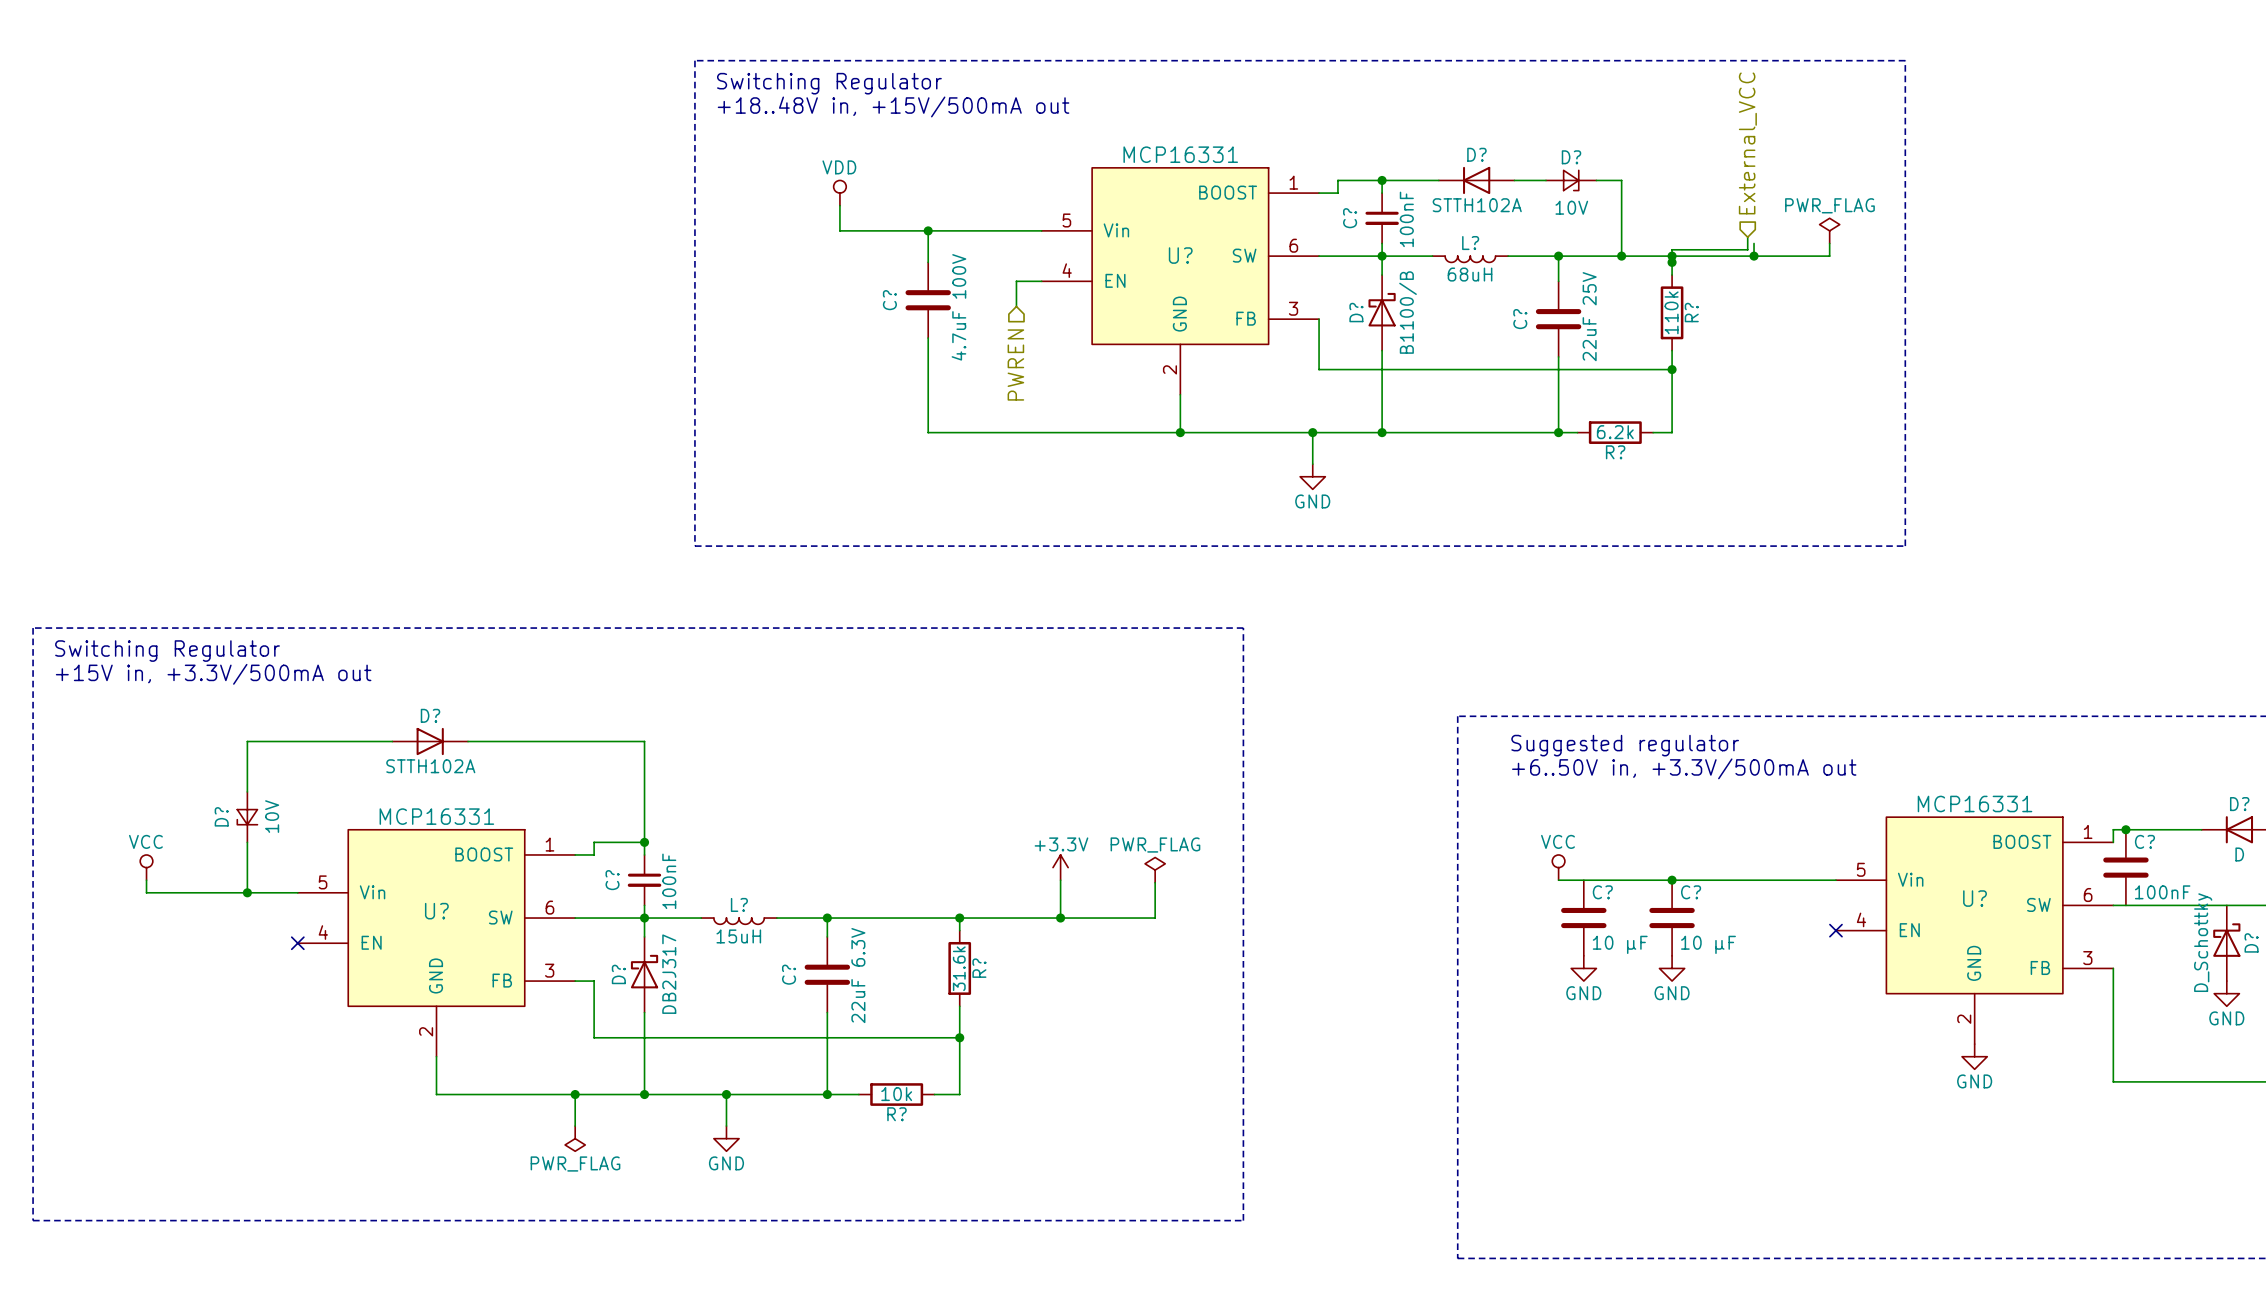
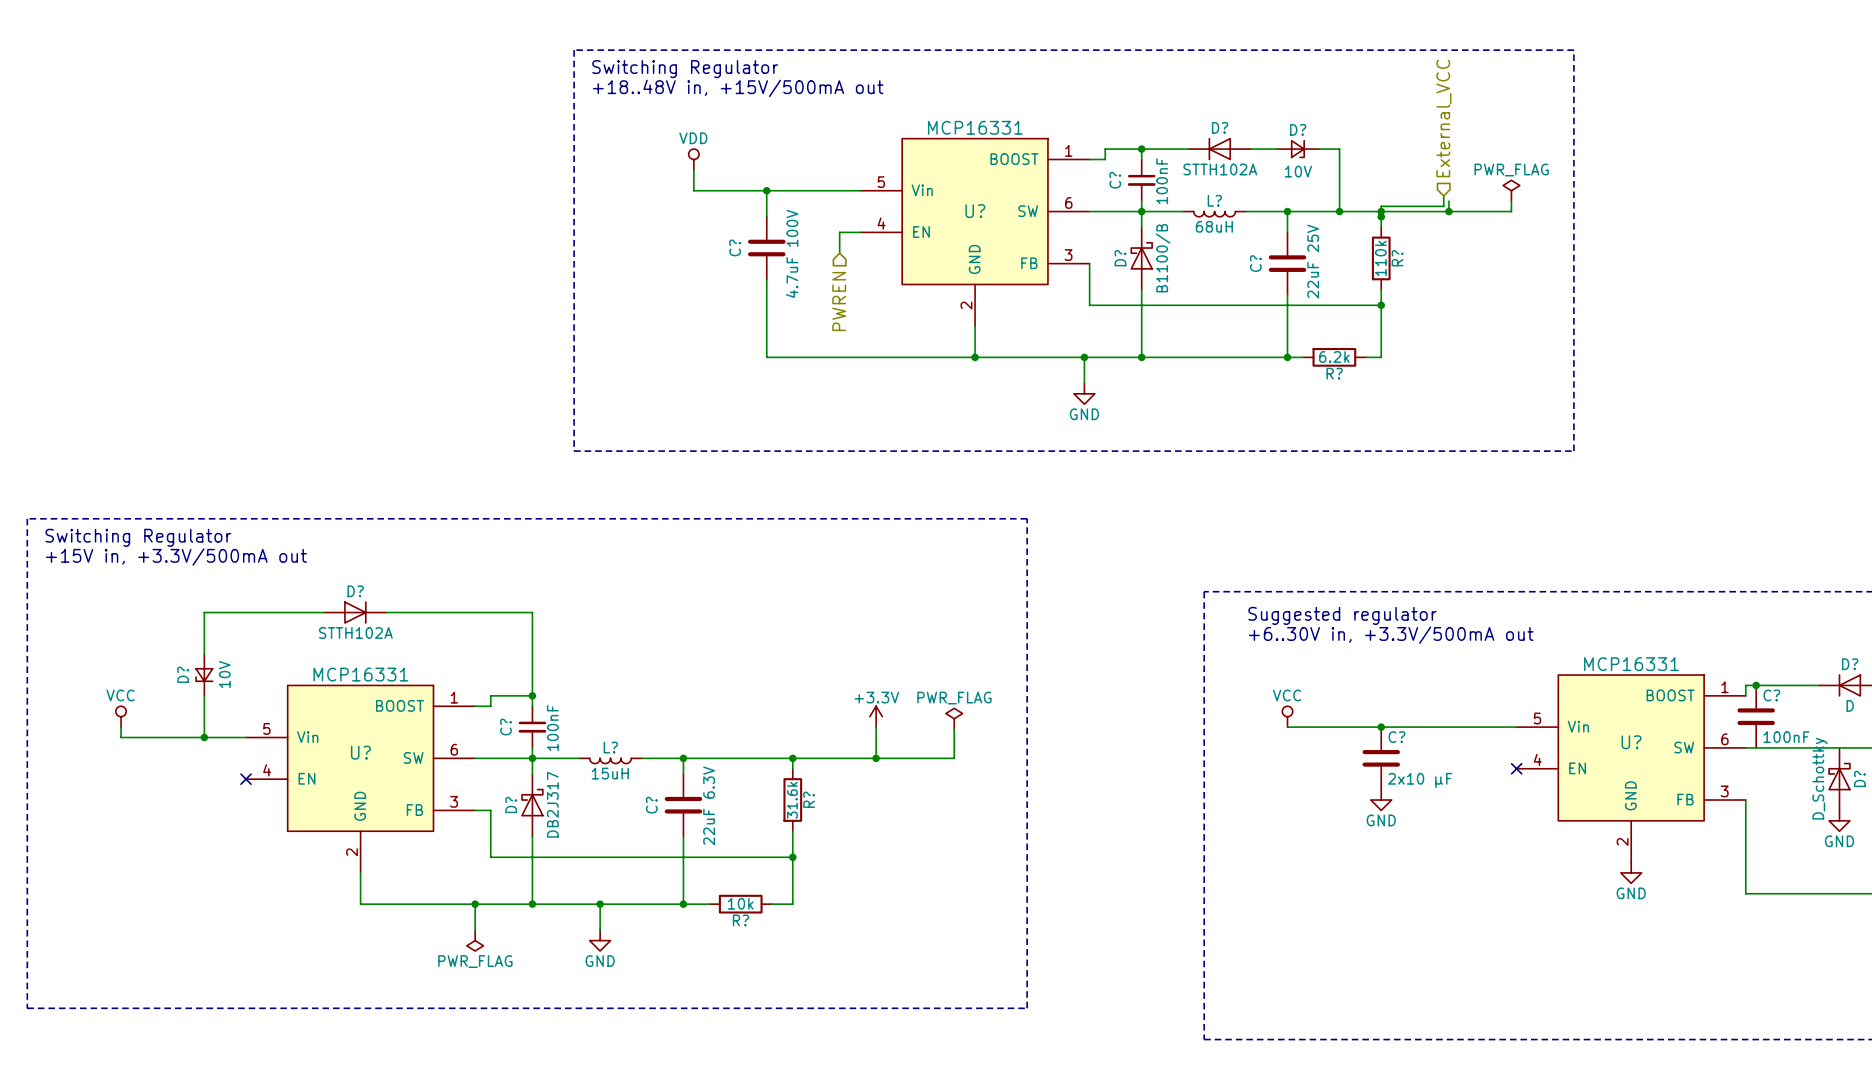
text: +6..50V in, +3.3V/500mA out (1684, 768) -> +6..30V in, +3.3V/500mA out (1391, 635)
C?: 10 µF (1583, 918) -> none
C? value: 10 µF (1708, 944) -> 2x10 µF (1420, 780)
power symbol: GND (1583, 968) -> none

